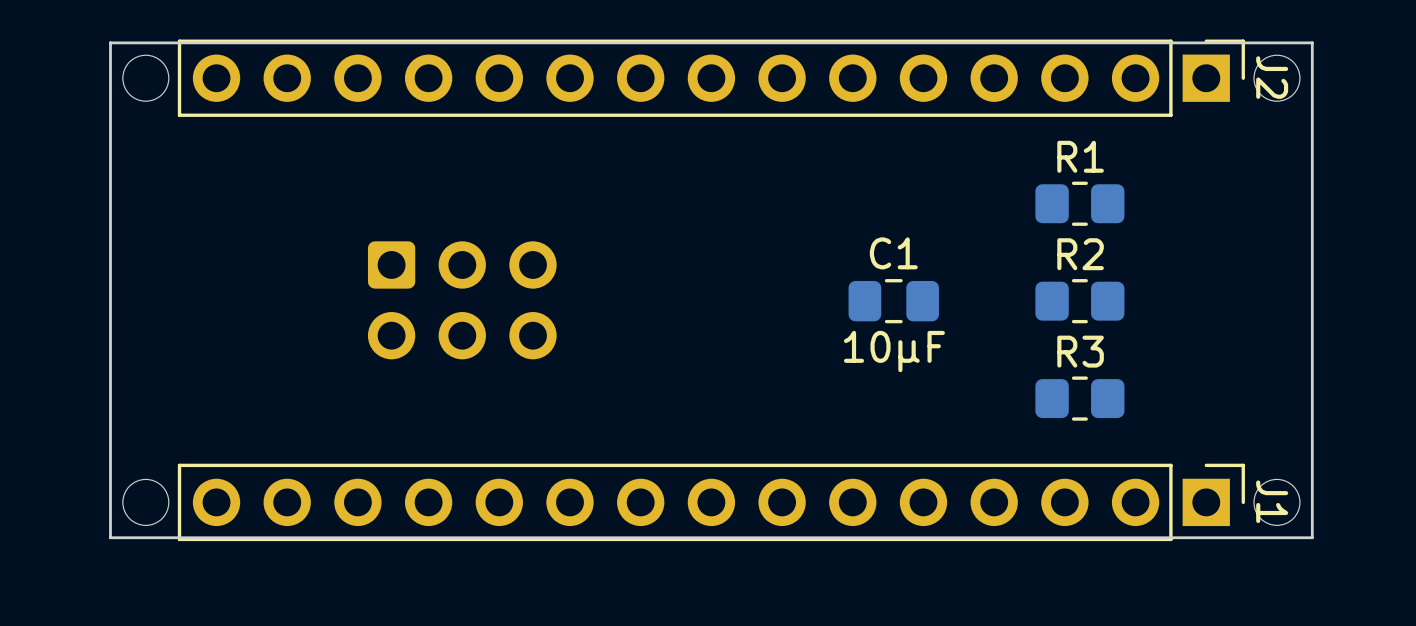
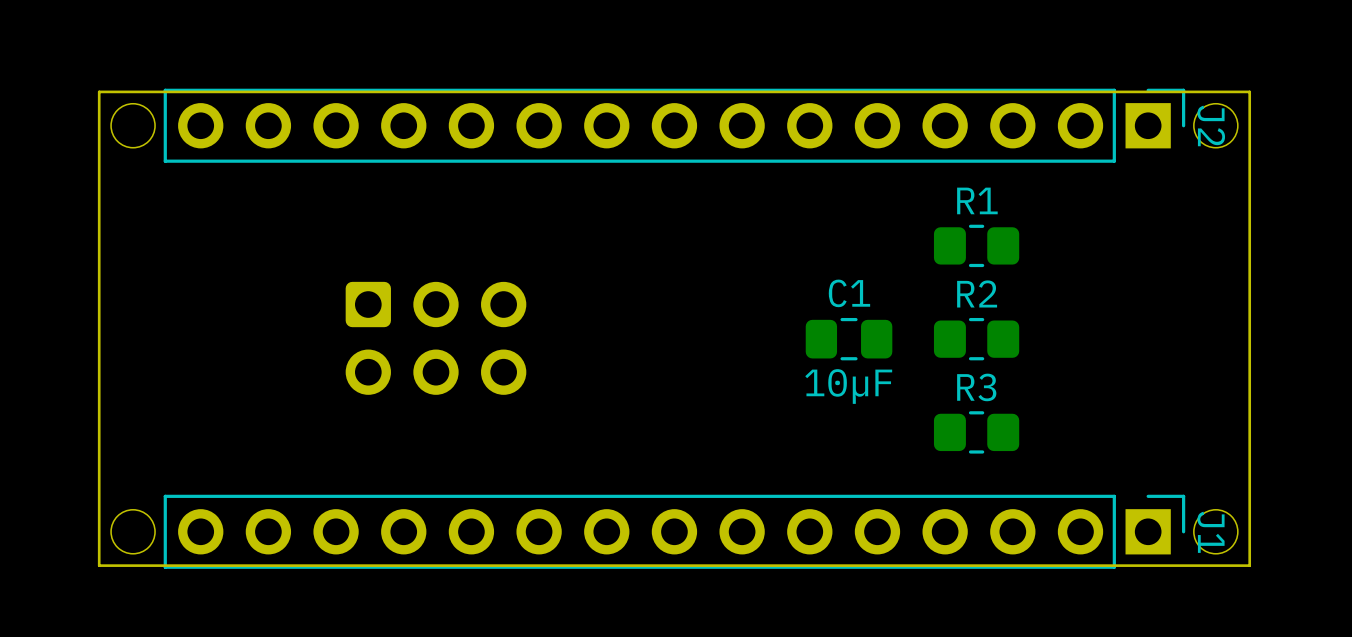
R1 position: (1079, 203) -> (976, 245)
R2 position: (1079, 301) -> (976, 339)
R3 position: (1079, 398) -> (976, 432)

